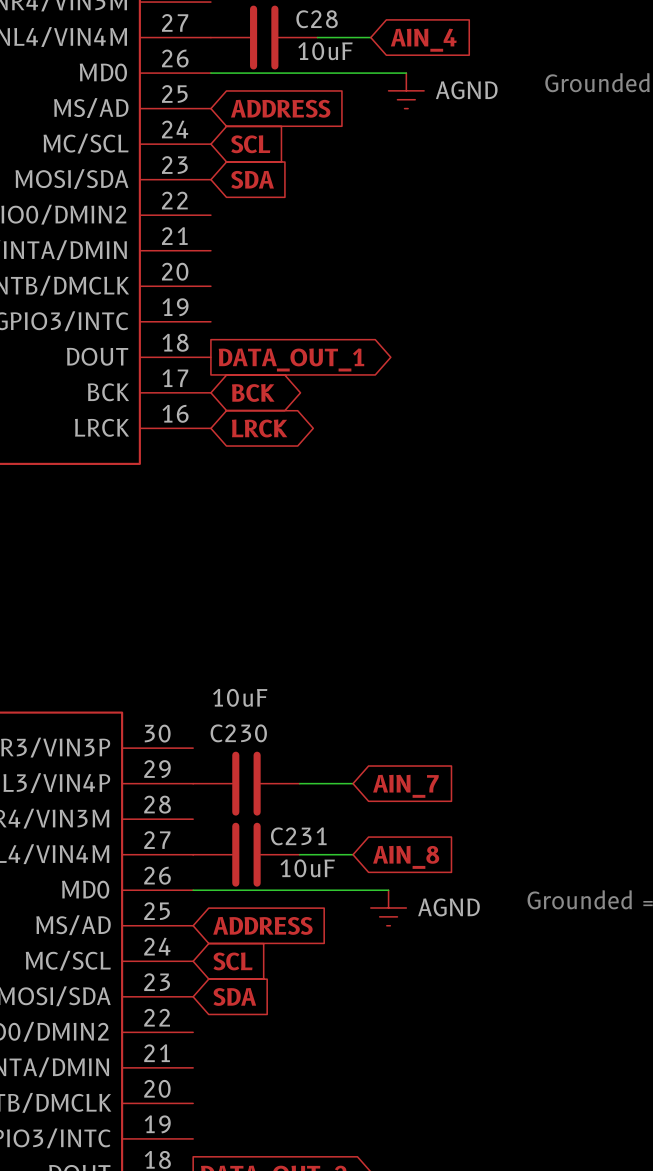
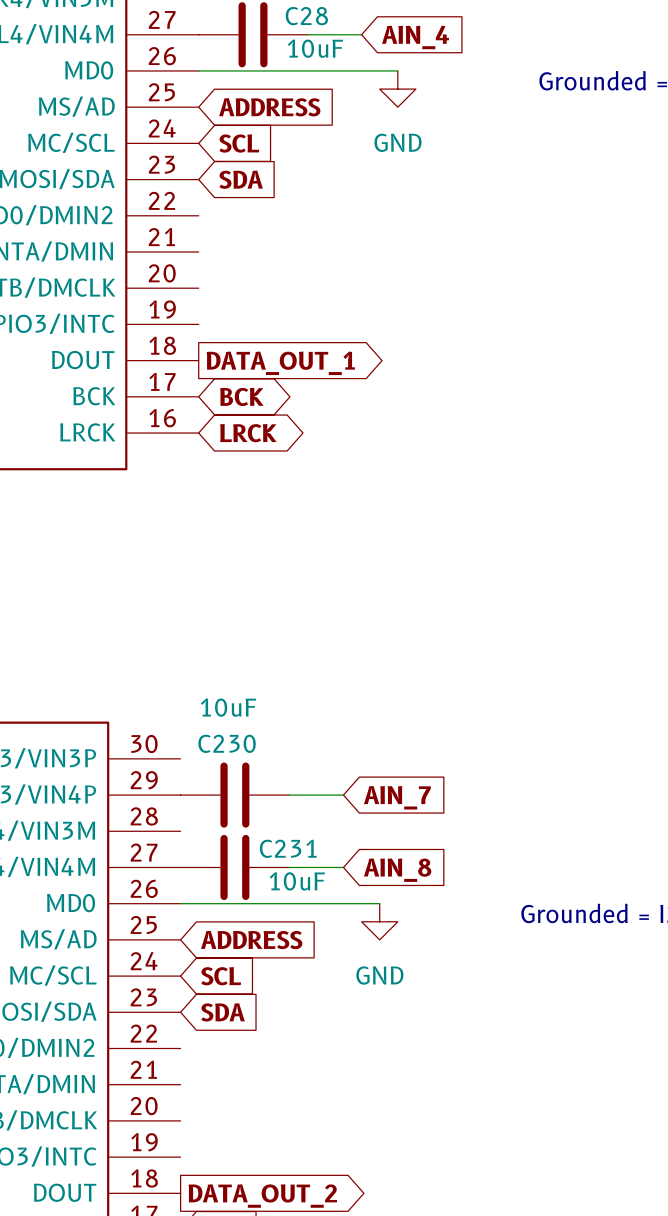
power symbol: AGND (406, 90) -> GND (397, 89)
power symbol: AGND (388, 908) -> GND (379, 921)

